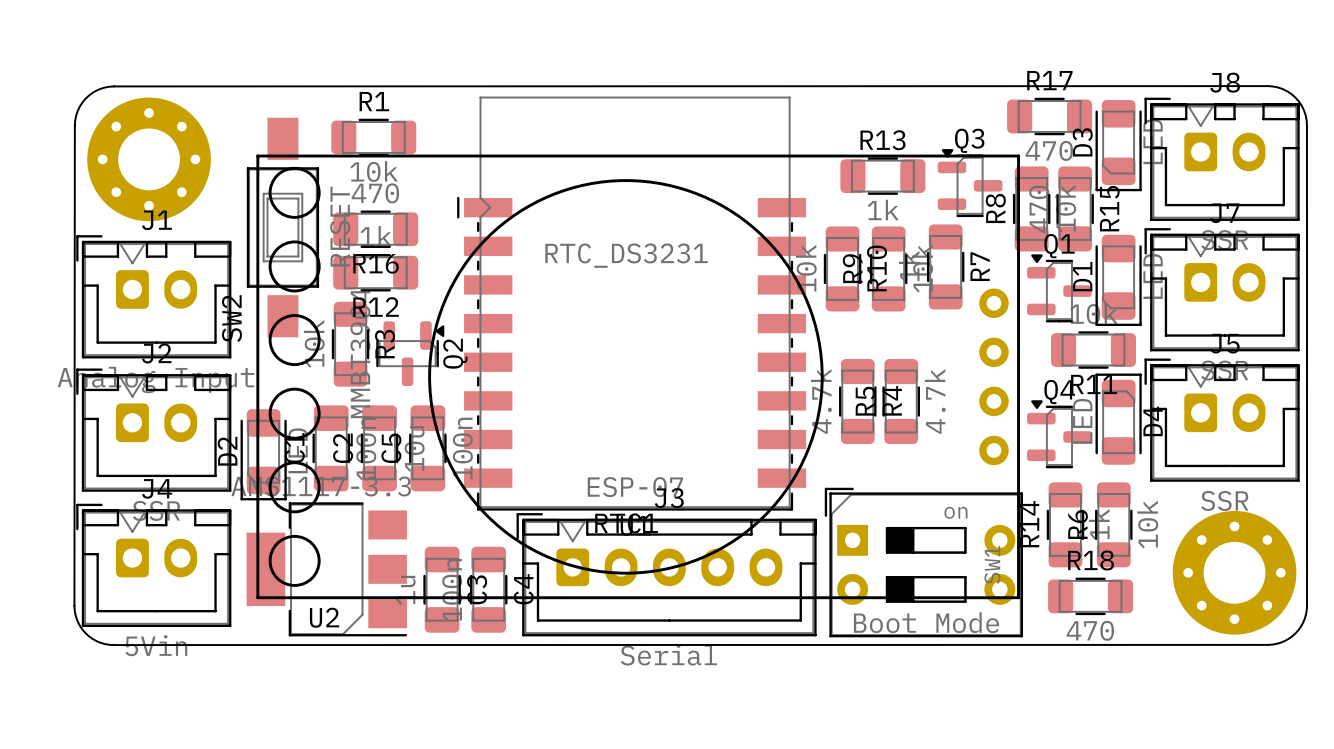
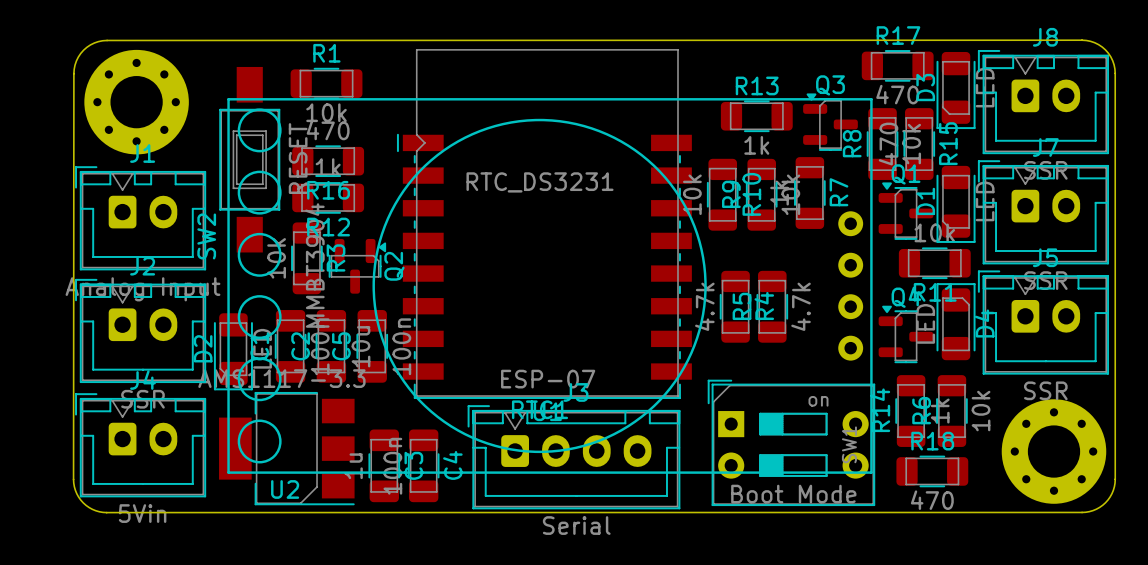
J3 footprint: [516, 513, 817, 637] -> [467, 405, 681, 510]

